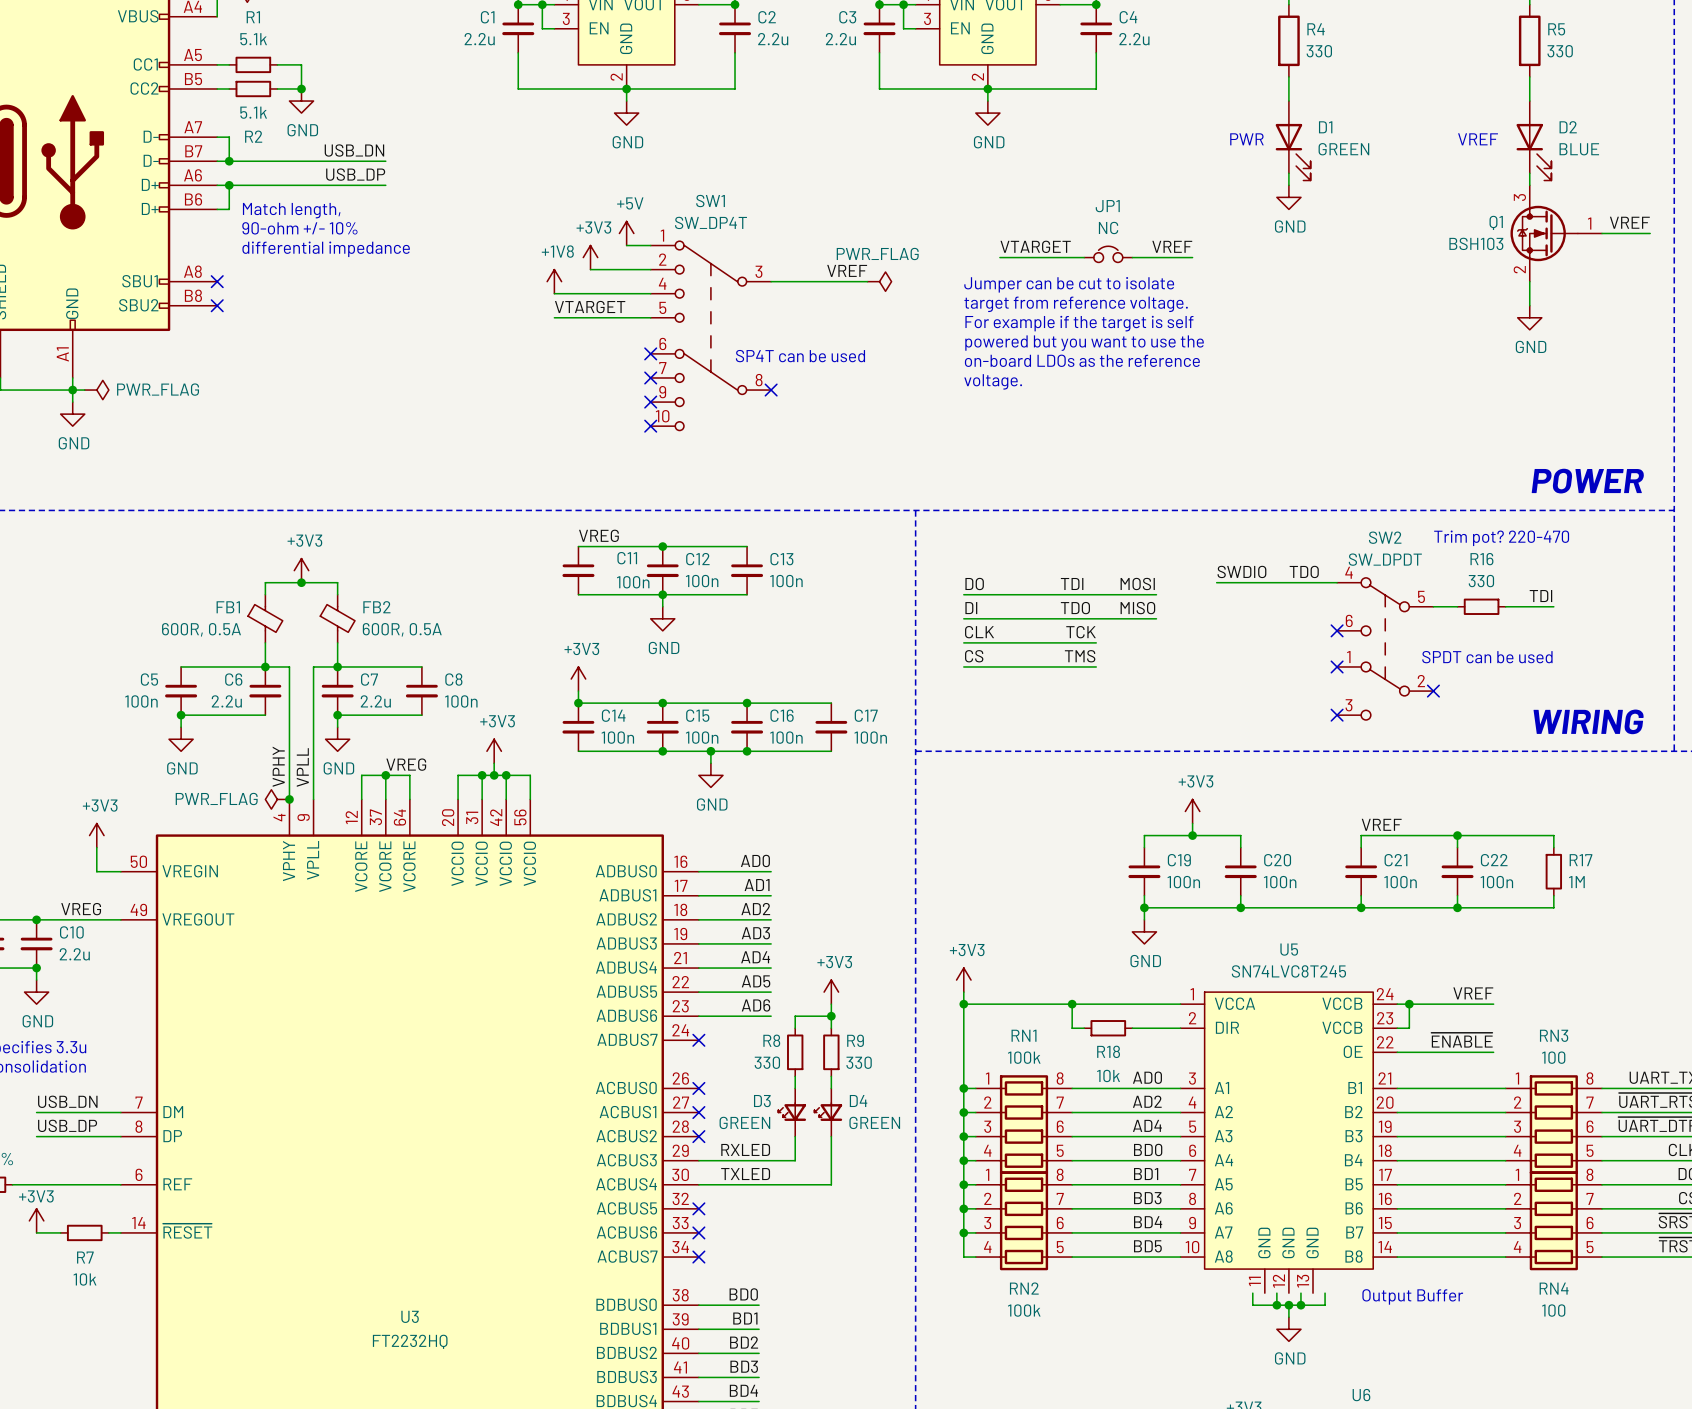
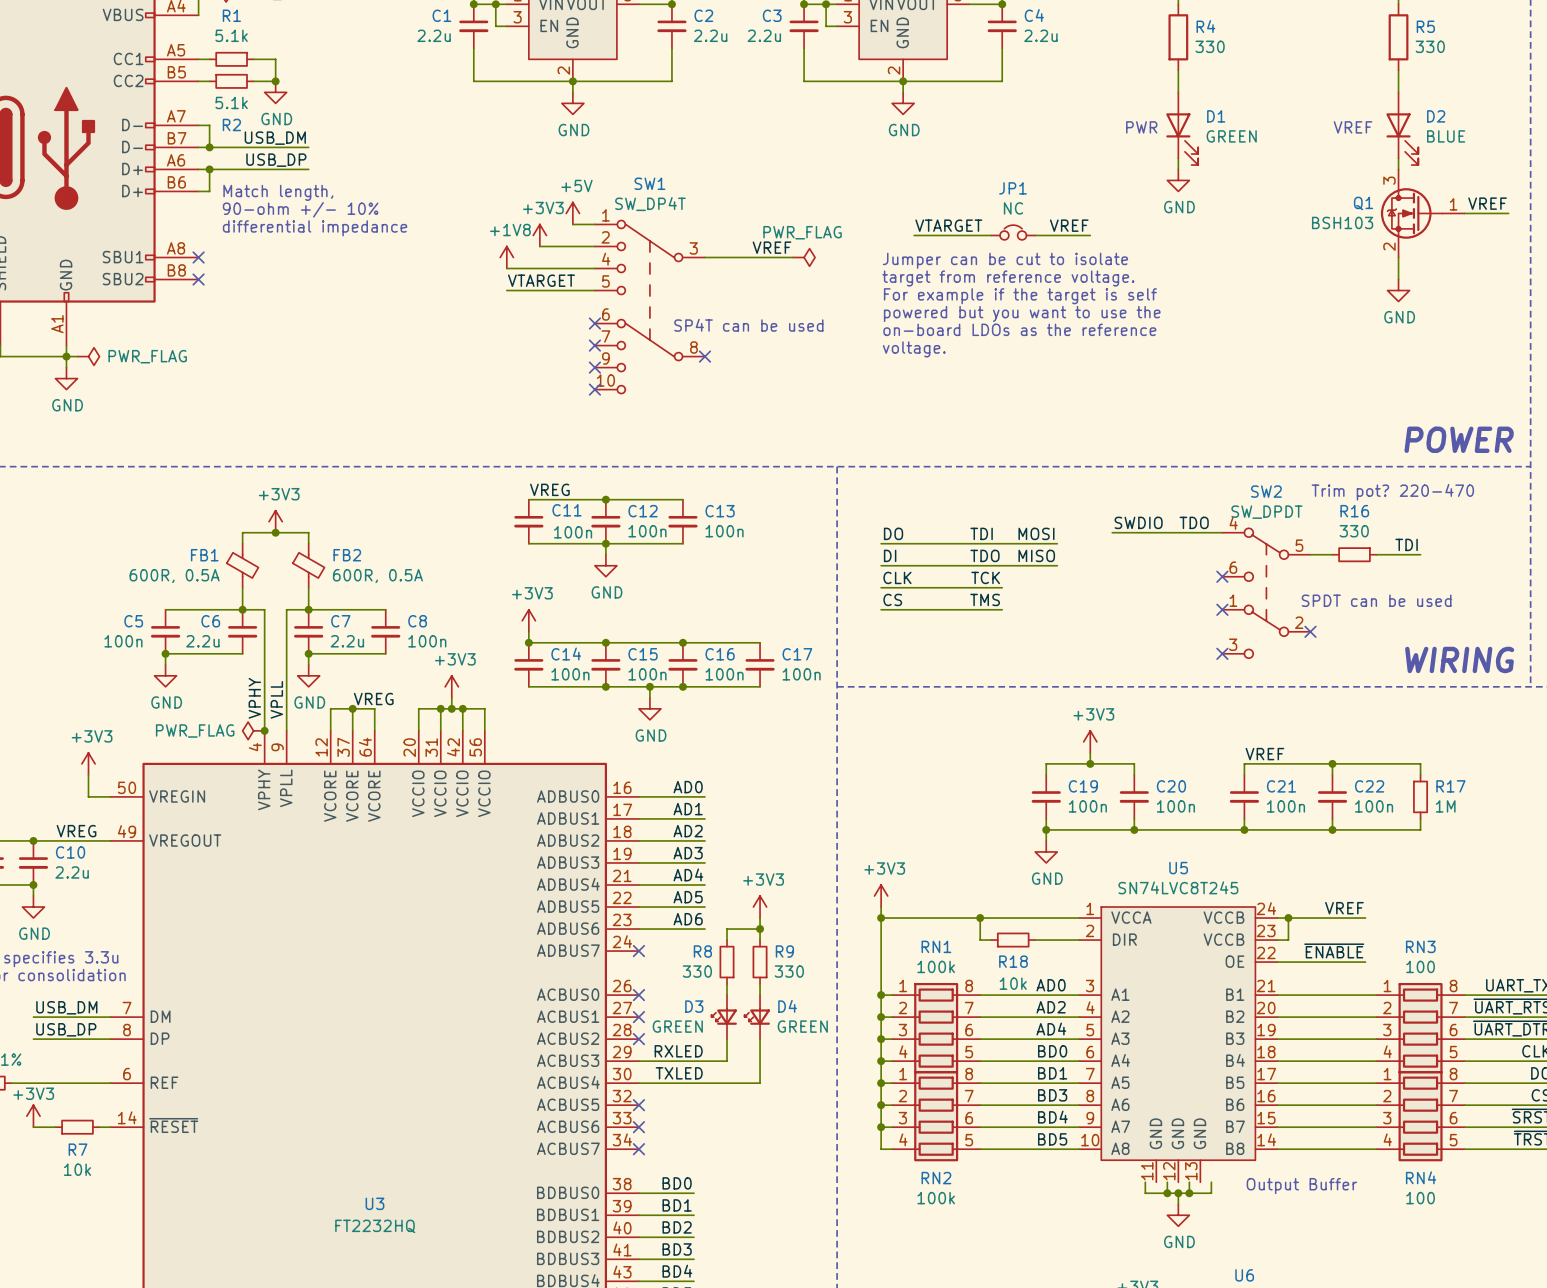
label: USB_DN (354, 150) -> USB_DM (275, 138)
wire: (337, 161) (385, 161) -> none
label position: USB_DP (355, 174) -> USB_DP (276, 160)
wire: (337, 185) (385, 185) -> none
label: USB_DN (67, 1101) -> USB_DM (66, 1007)

